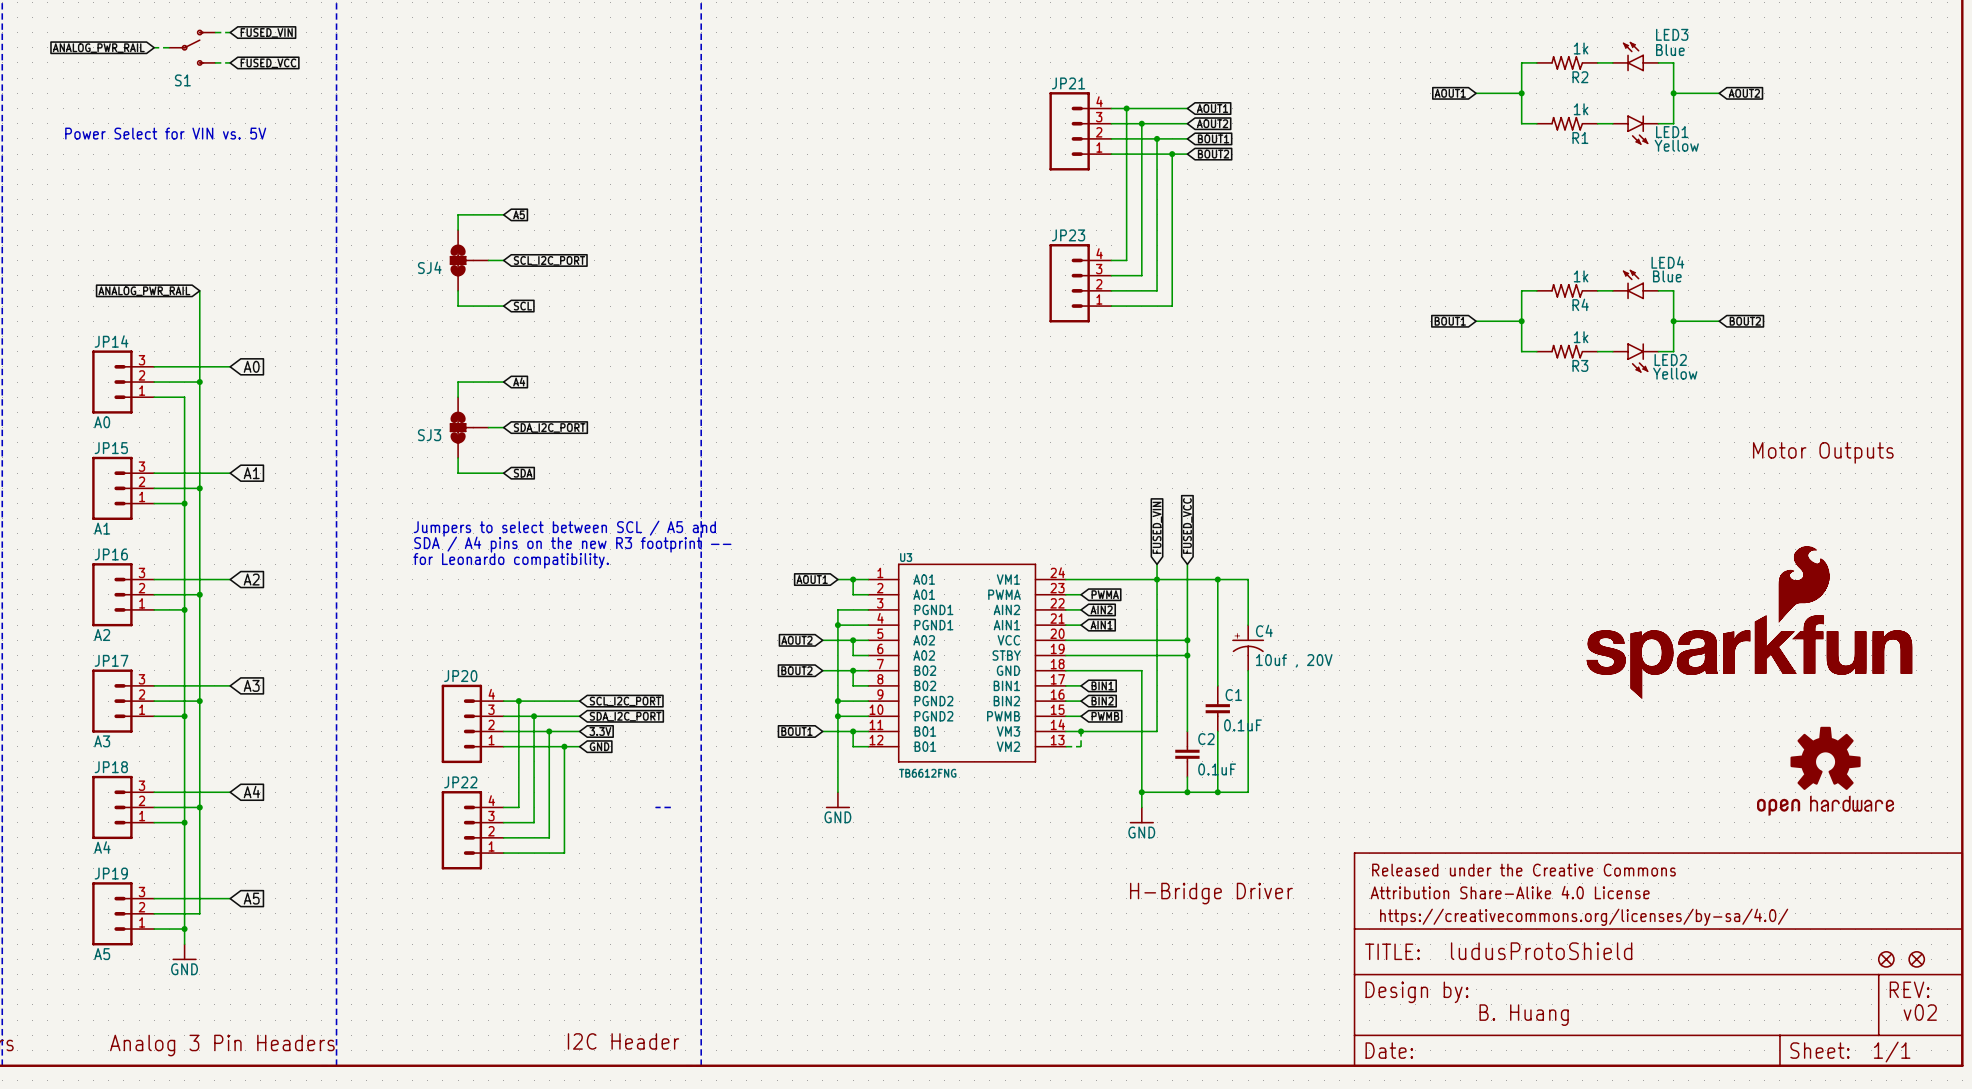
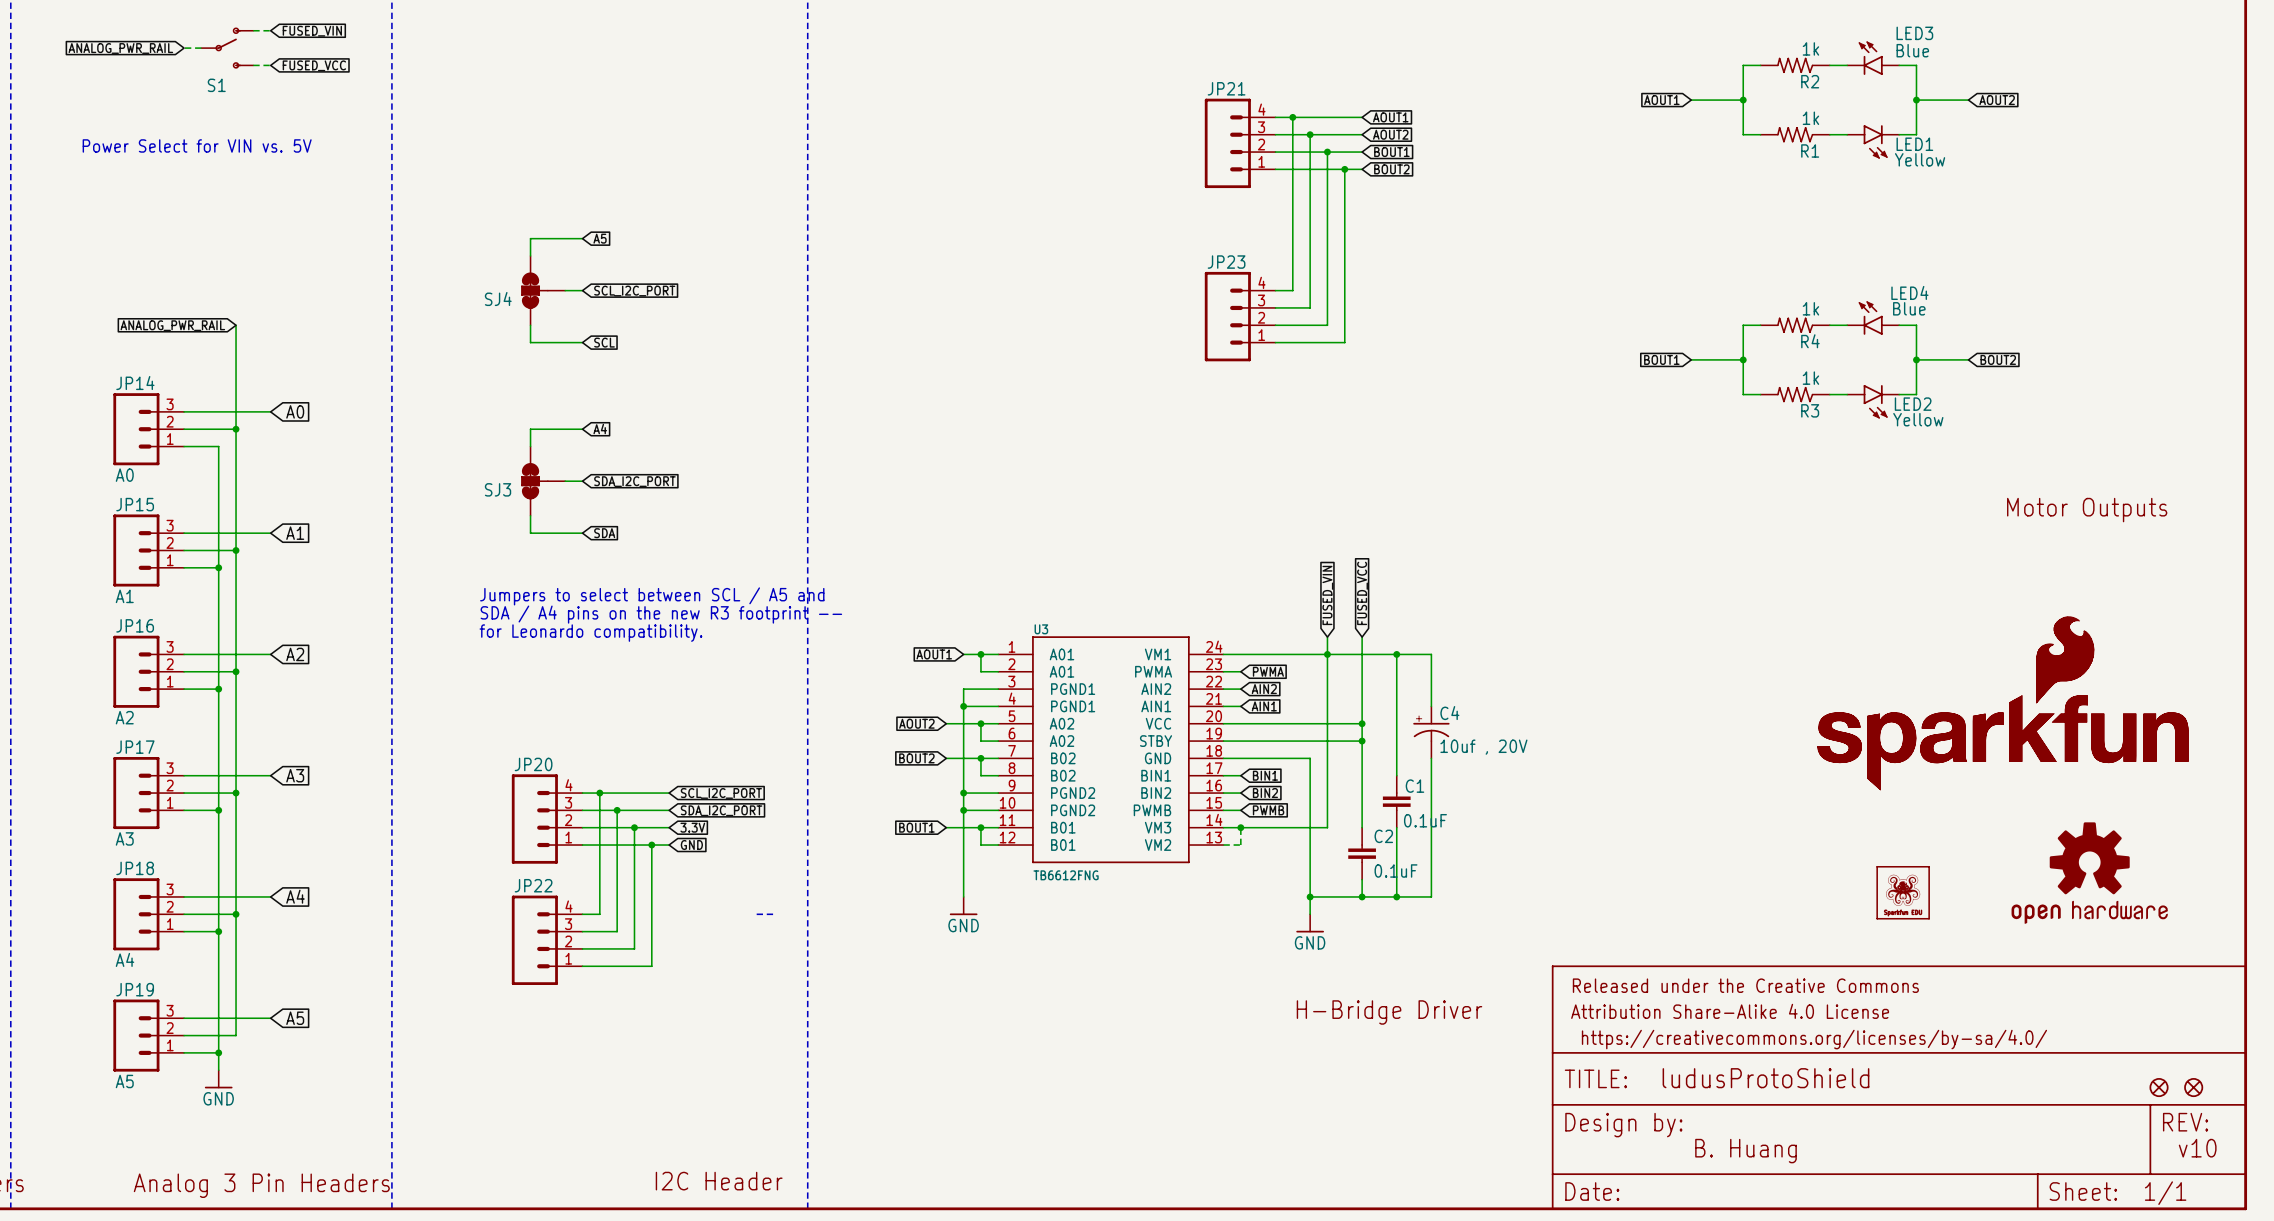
part: none -> (1903, 892)
text: v02 (1920, 1012) -> v10 (2197, 1148)

